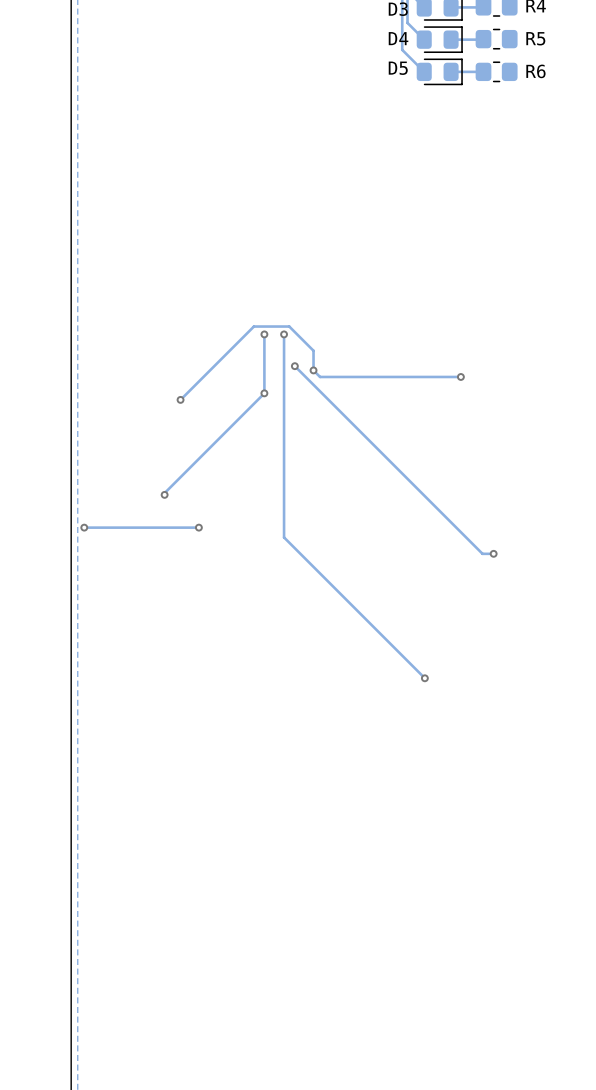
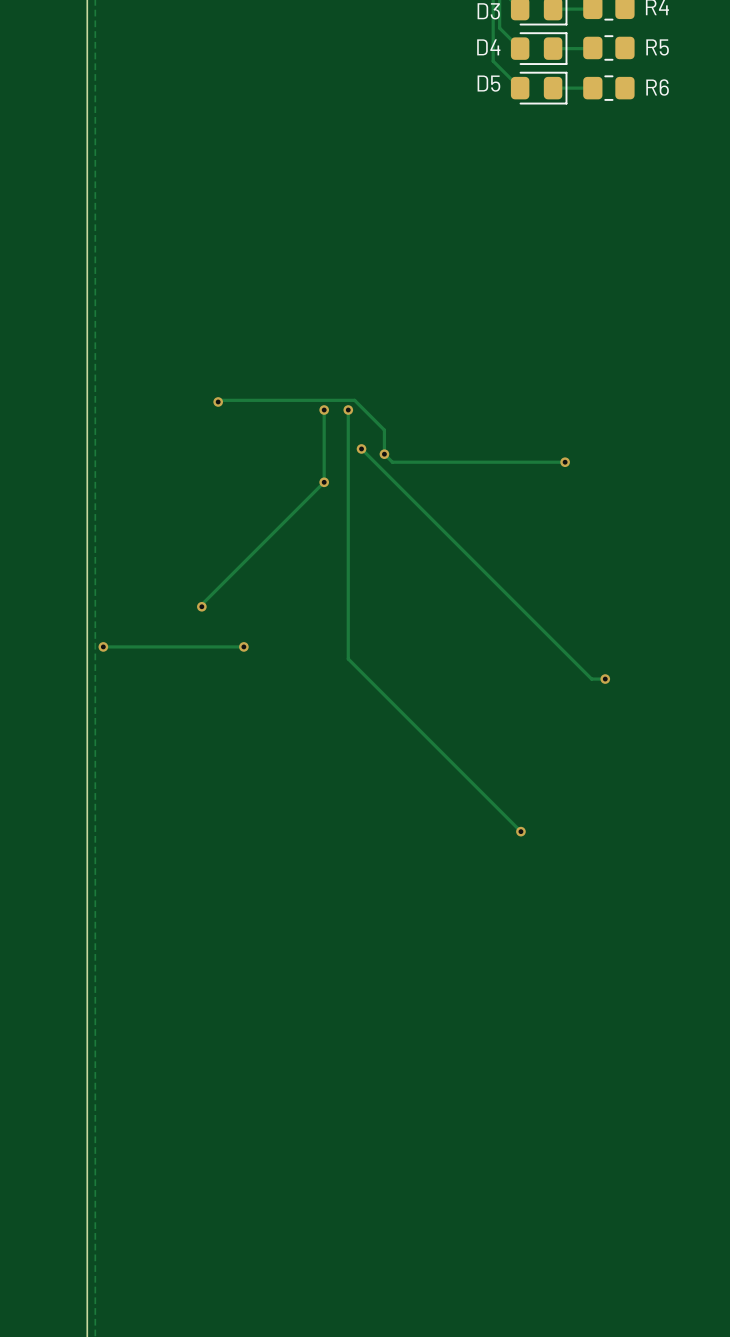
track: (253, 326) (180, 399) -> (311, 400) (219, 400) (218, 401)
via position: (180, 399) -> (218, 401)

